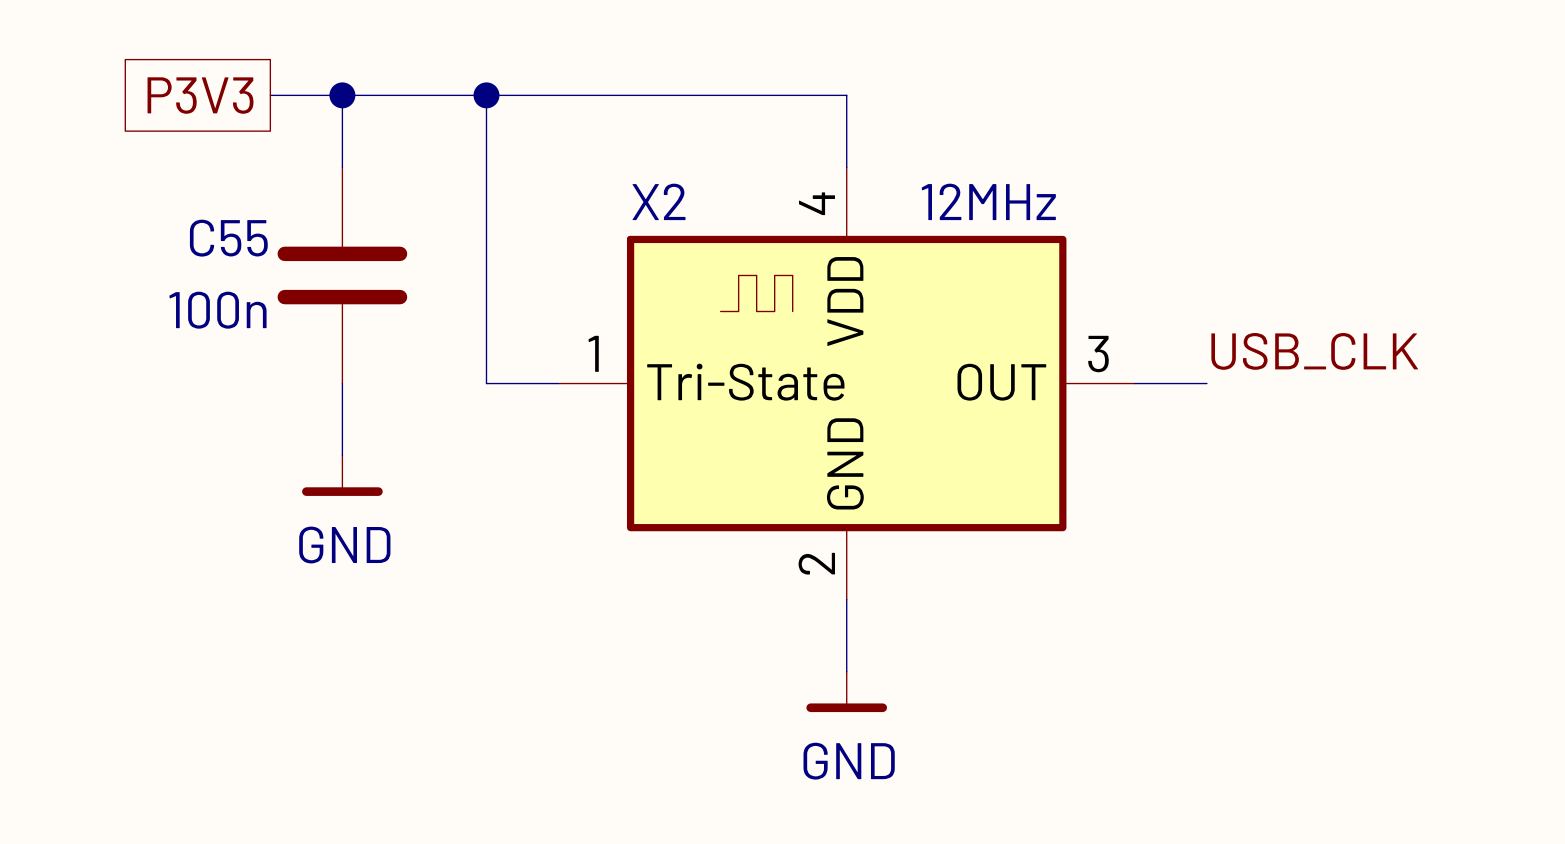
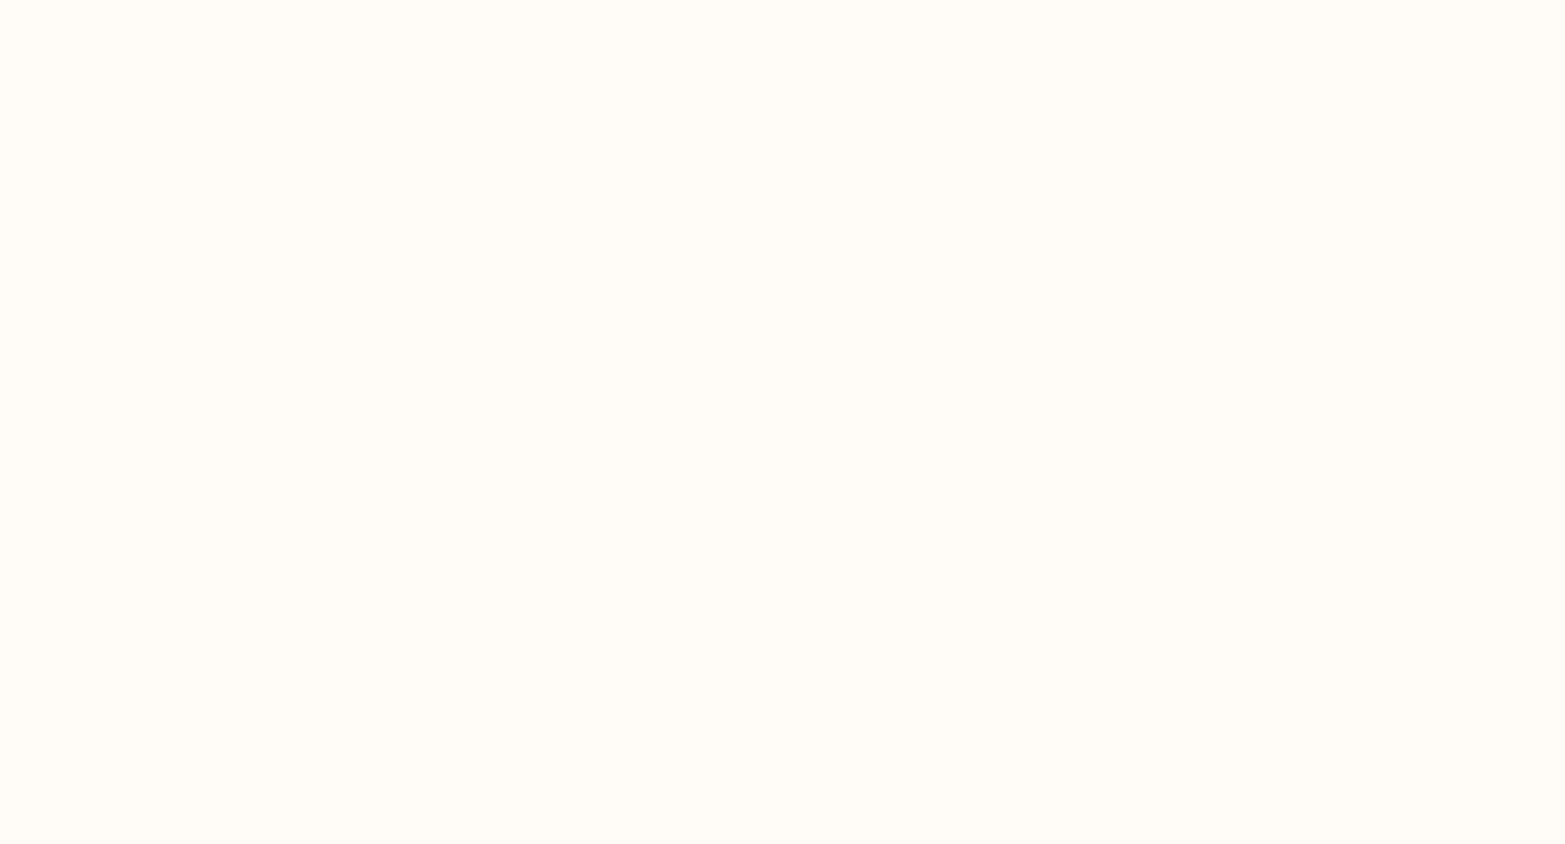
global label: P3V3 (200, 95) -> none
wire: (270, 95) (846, 95) (846, 167) -> none
wire: (342, 95) (342, 167) -> none
junction: (342, 95) -> none
wire: (486, 95) (486, 383) (558, 383) -> none
junction: (486, 95) -> none
C55: 100n (342, 275) -> none
label: USB_CLK (1314, 351) -> none
wire: (342, 383) (342, 455) -> none
X2: 12MHz (846, 383) -> none
wire: (1134, 383) (1206, 383) -> none
power symbol: GND (342, 475) -> none
wire: (846, 599) (846, 671) -> none
power symbol: GND (846, 691) -> none

